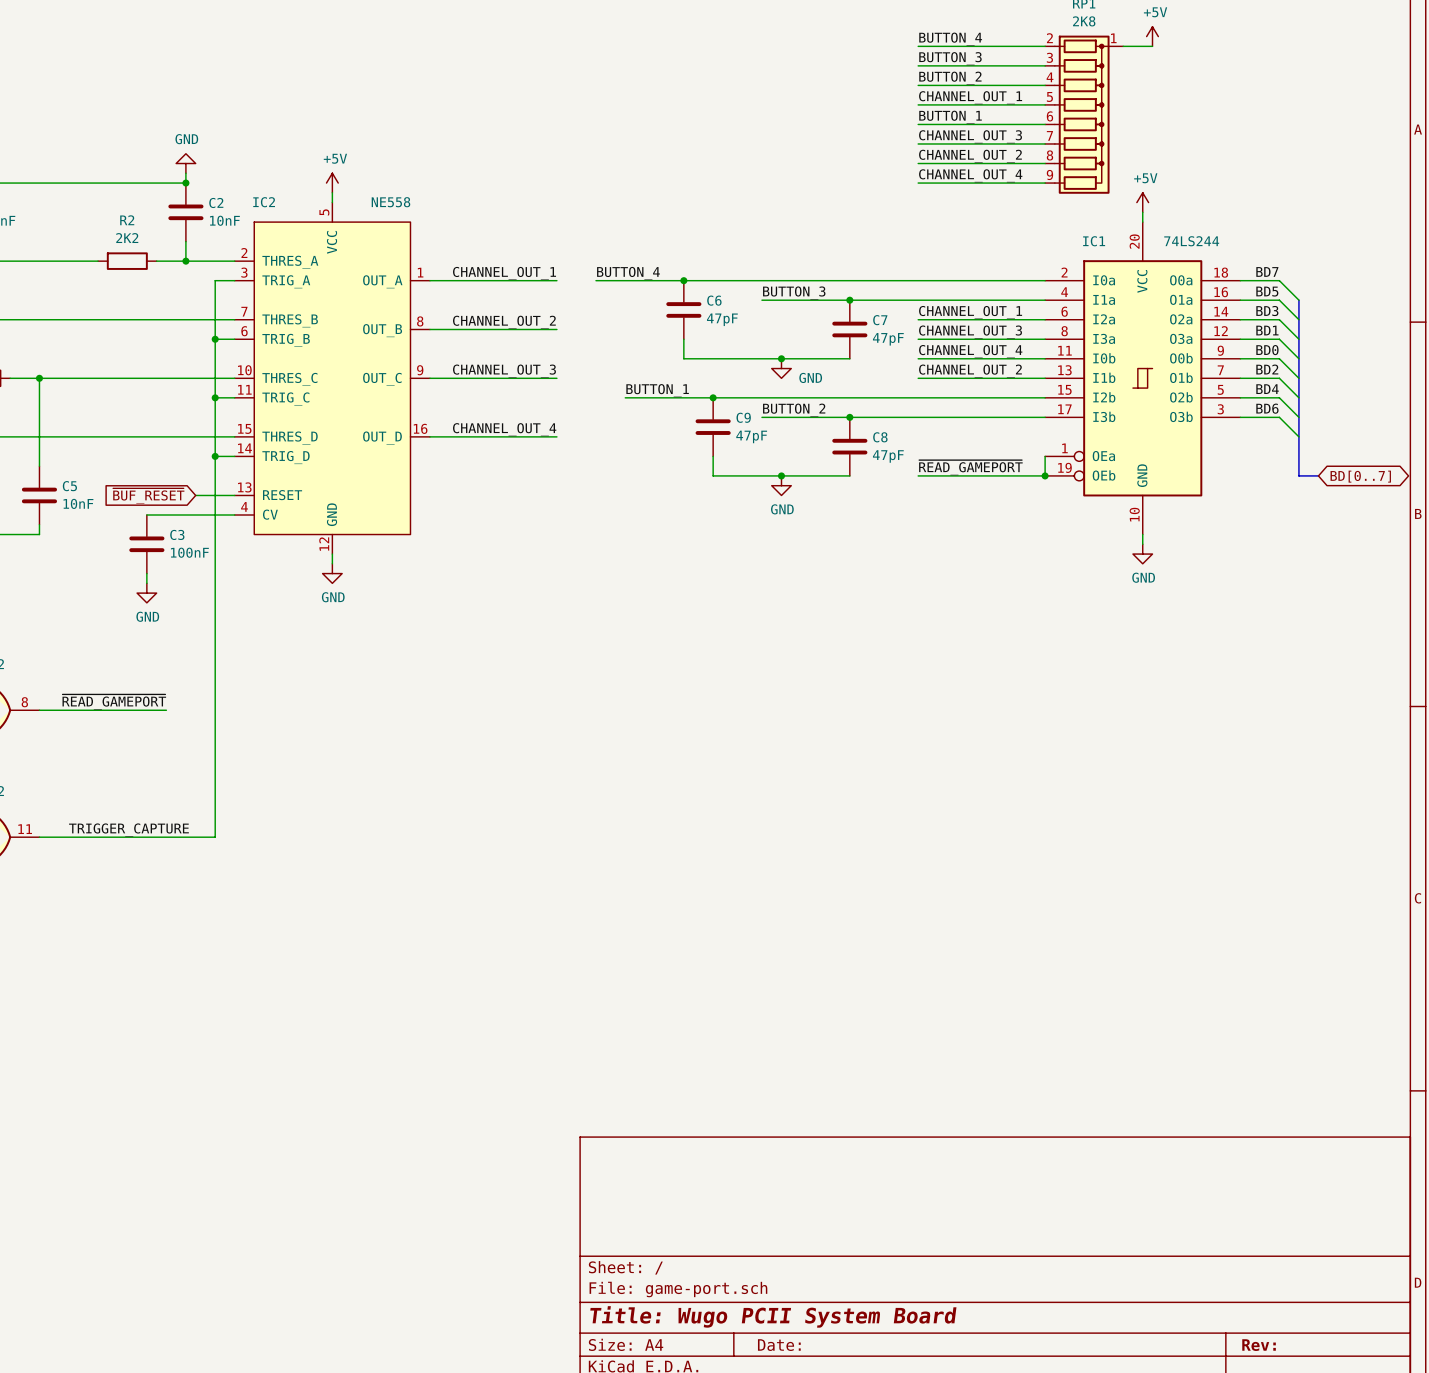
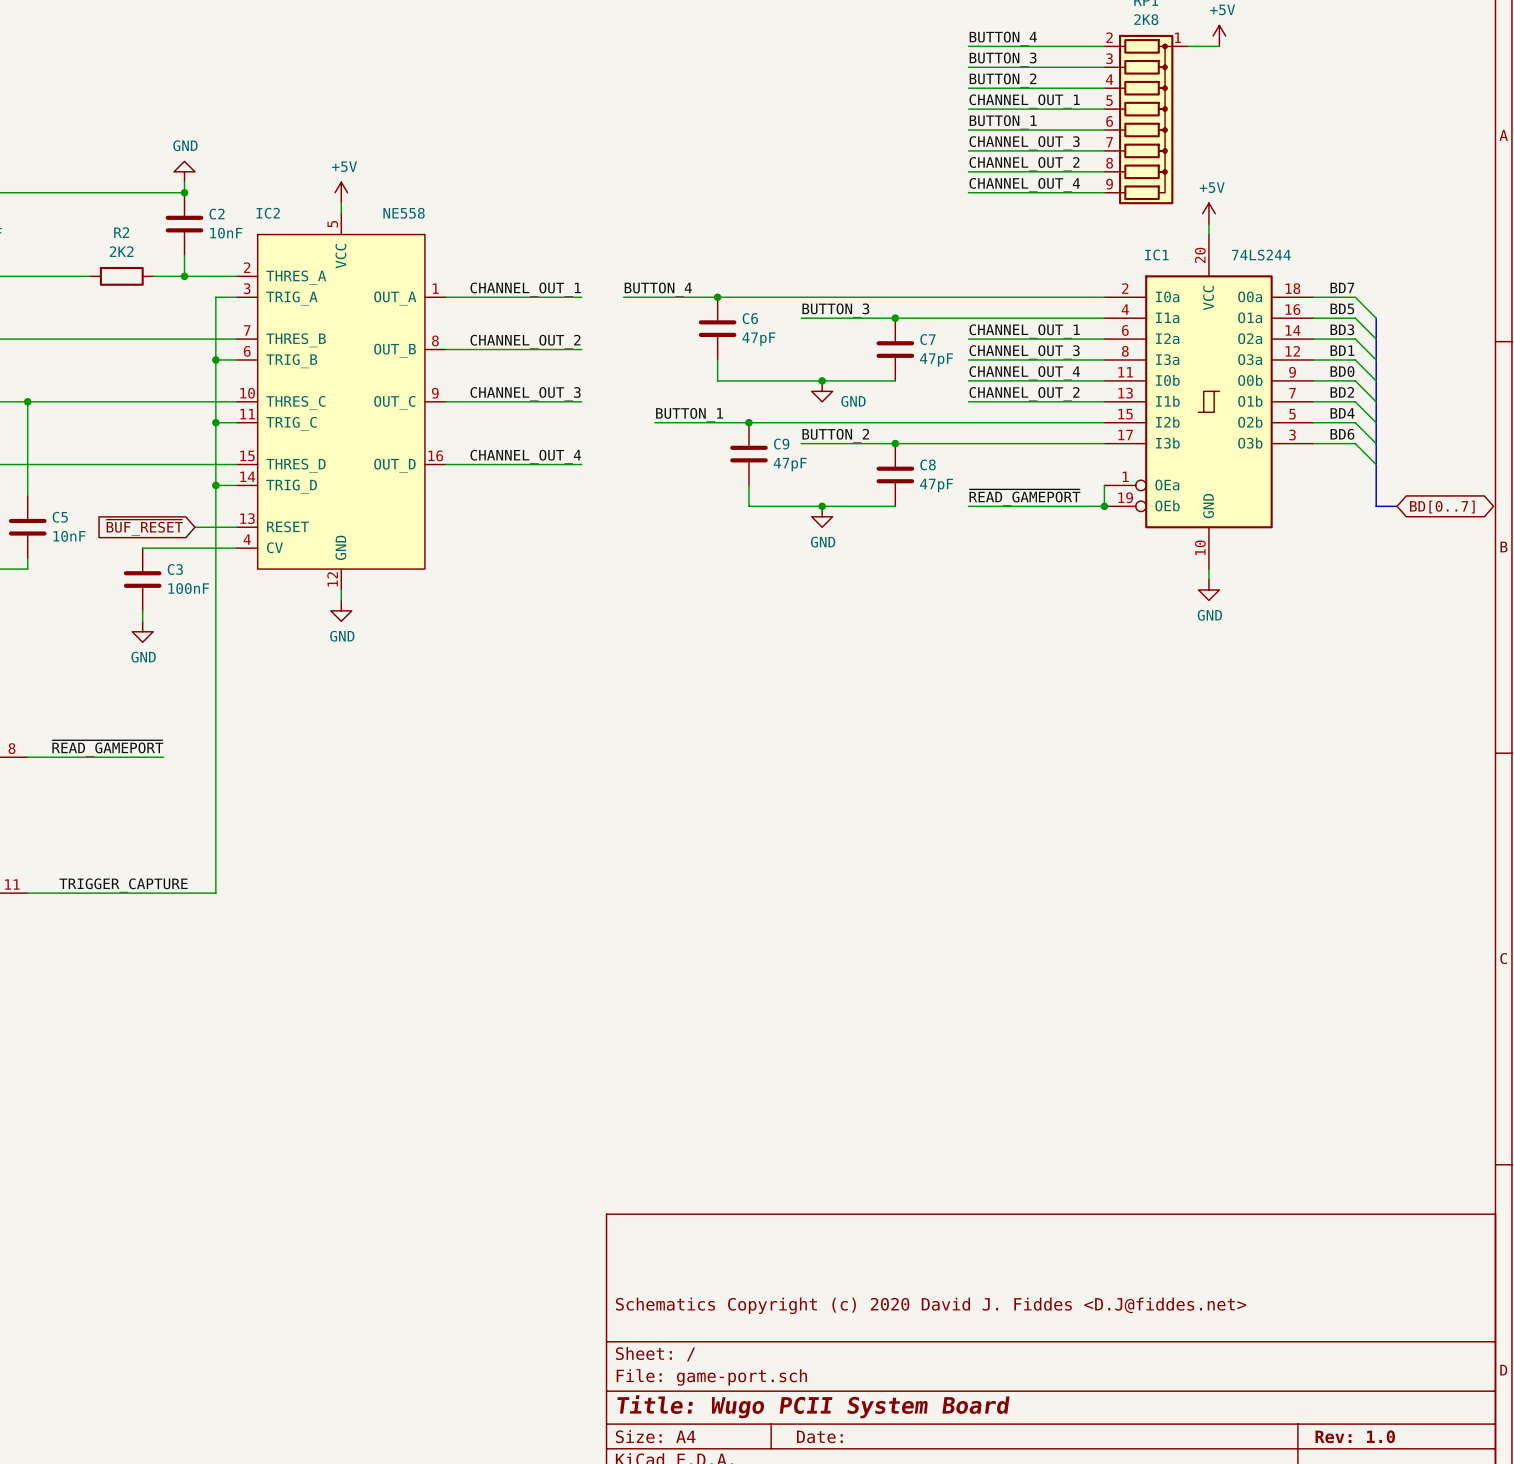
title block: none -> Schematics Copyright (c) 2020 David J. Fiddes <D.J@fiddes.net> (931, 1305)
title block: Rev: (1259, 1345) -> Rev: 1.0 (1355, 1436)

